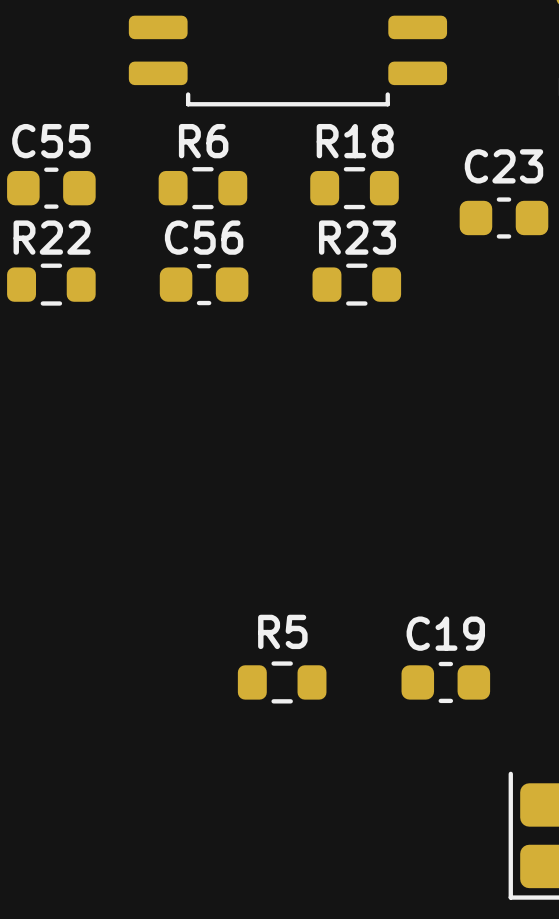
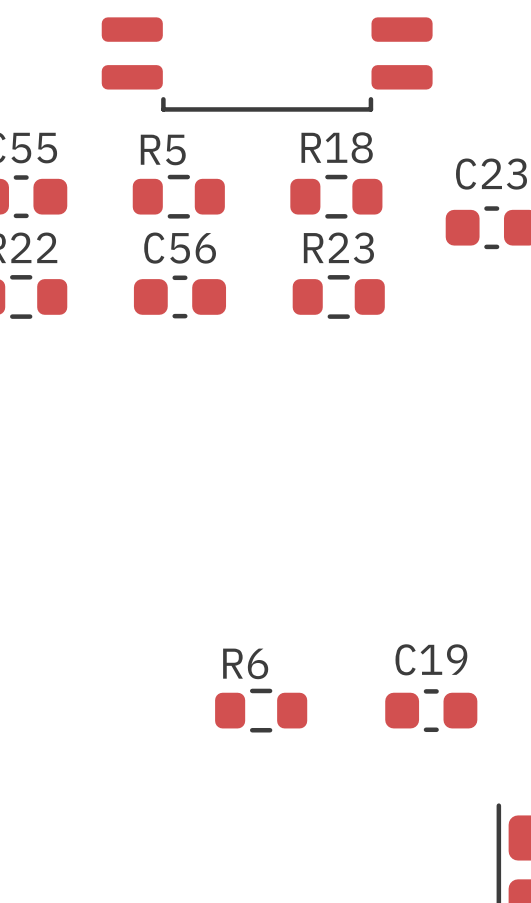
R6 name: R6 (203, 141) -> R5 (163, 149)
R5 name: R5 (282, 631) -> R6 (245, 663)

